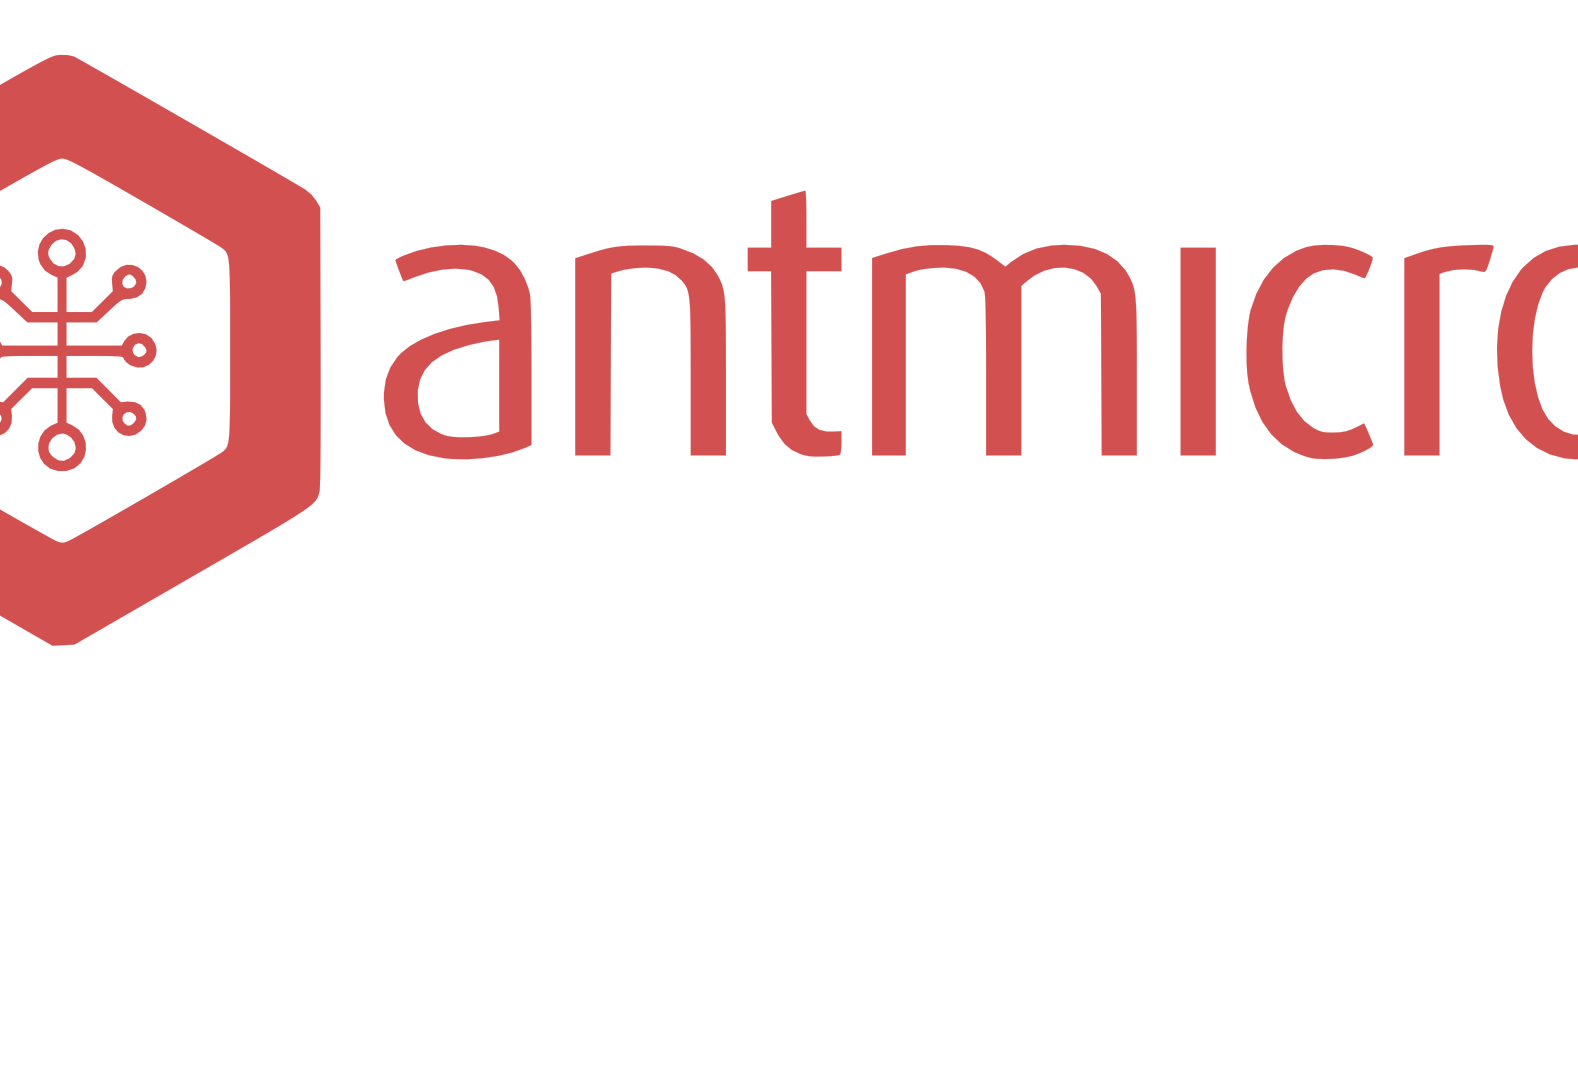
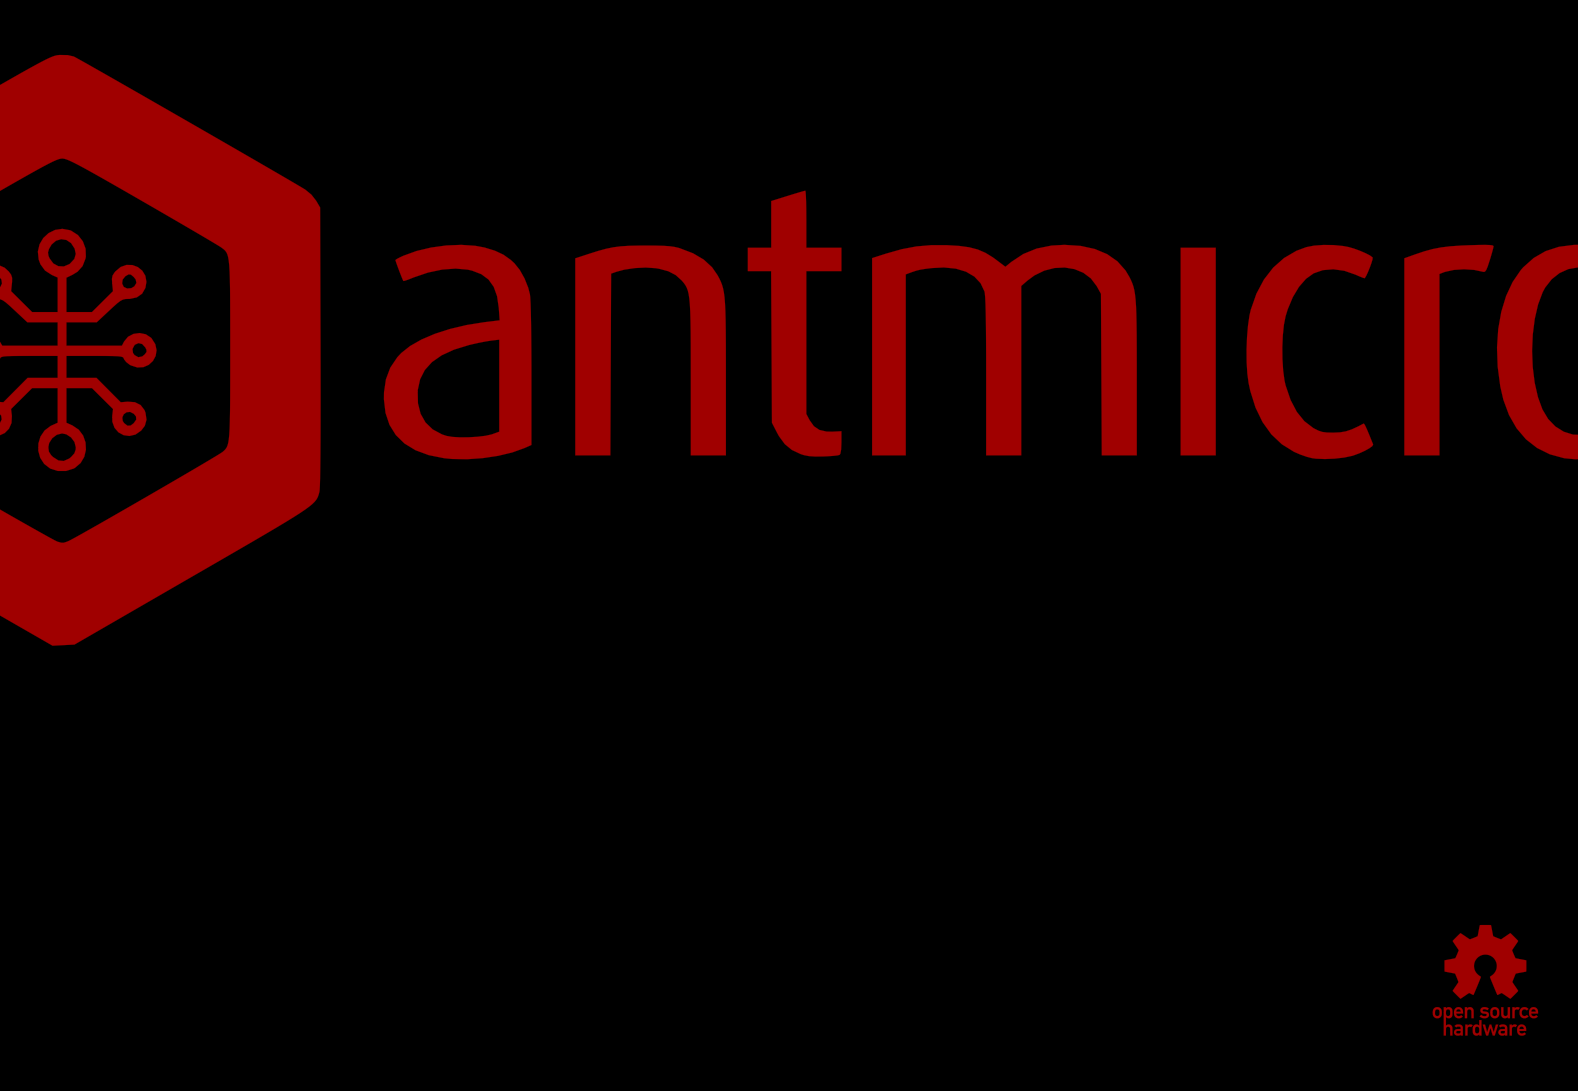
drawing: none -> [1432, 924, 1539, 1036]

